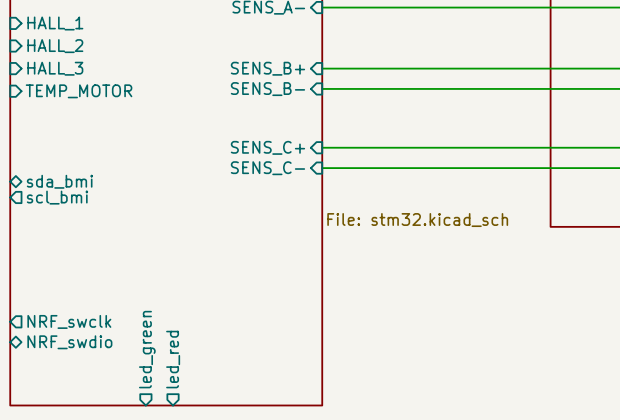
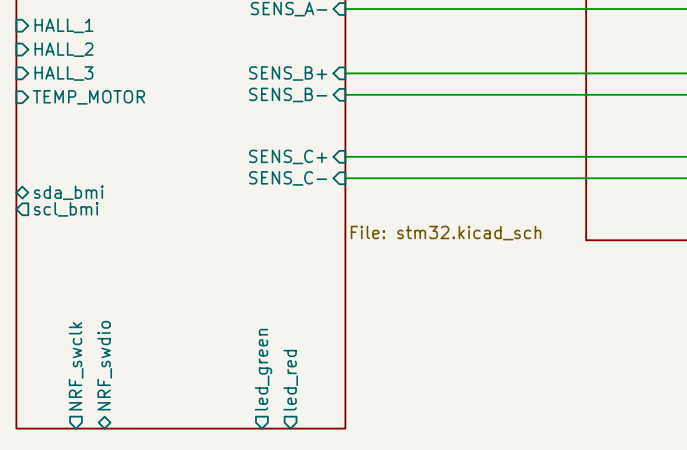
sheet pin rotation: 0° (69, 321) -> 90° counterclockwise (76, 366)
sheet pin rotation: 0° (69, 342) -> 90° counterclockwise (104, 365)
sheet pin position: led_green (147, 349) -> led_green (263, 369)
sheet pin position: led_red (173, 359) -> led_red (290, 380)

